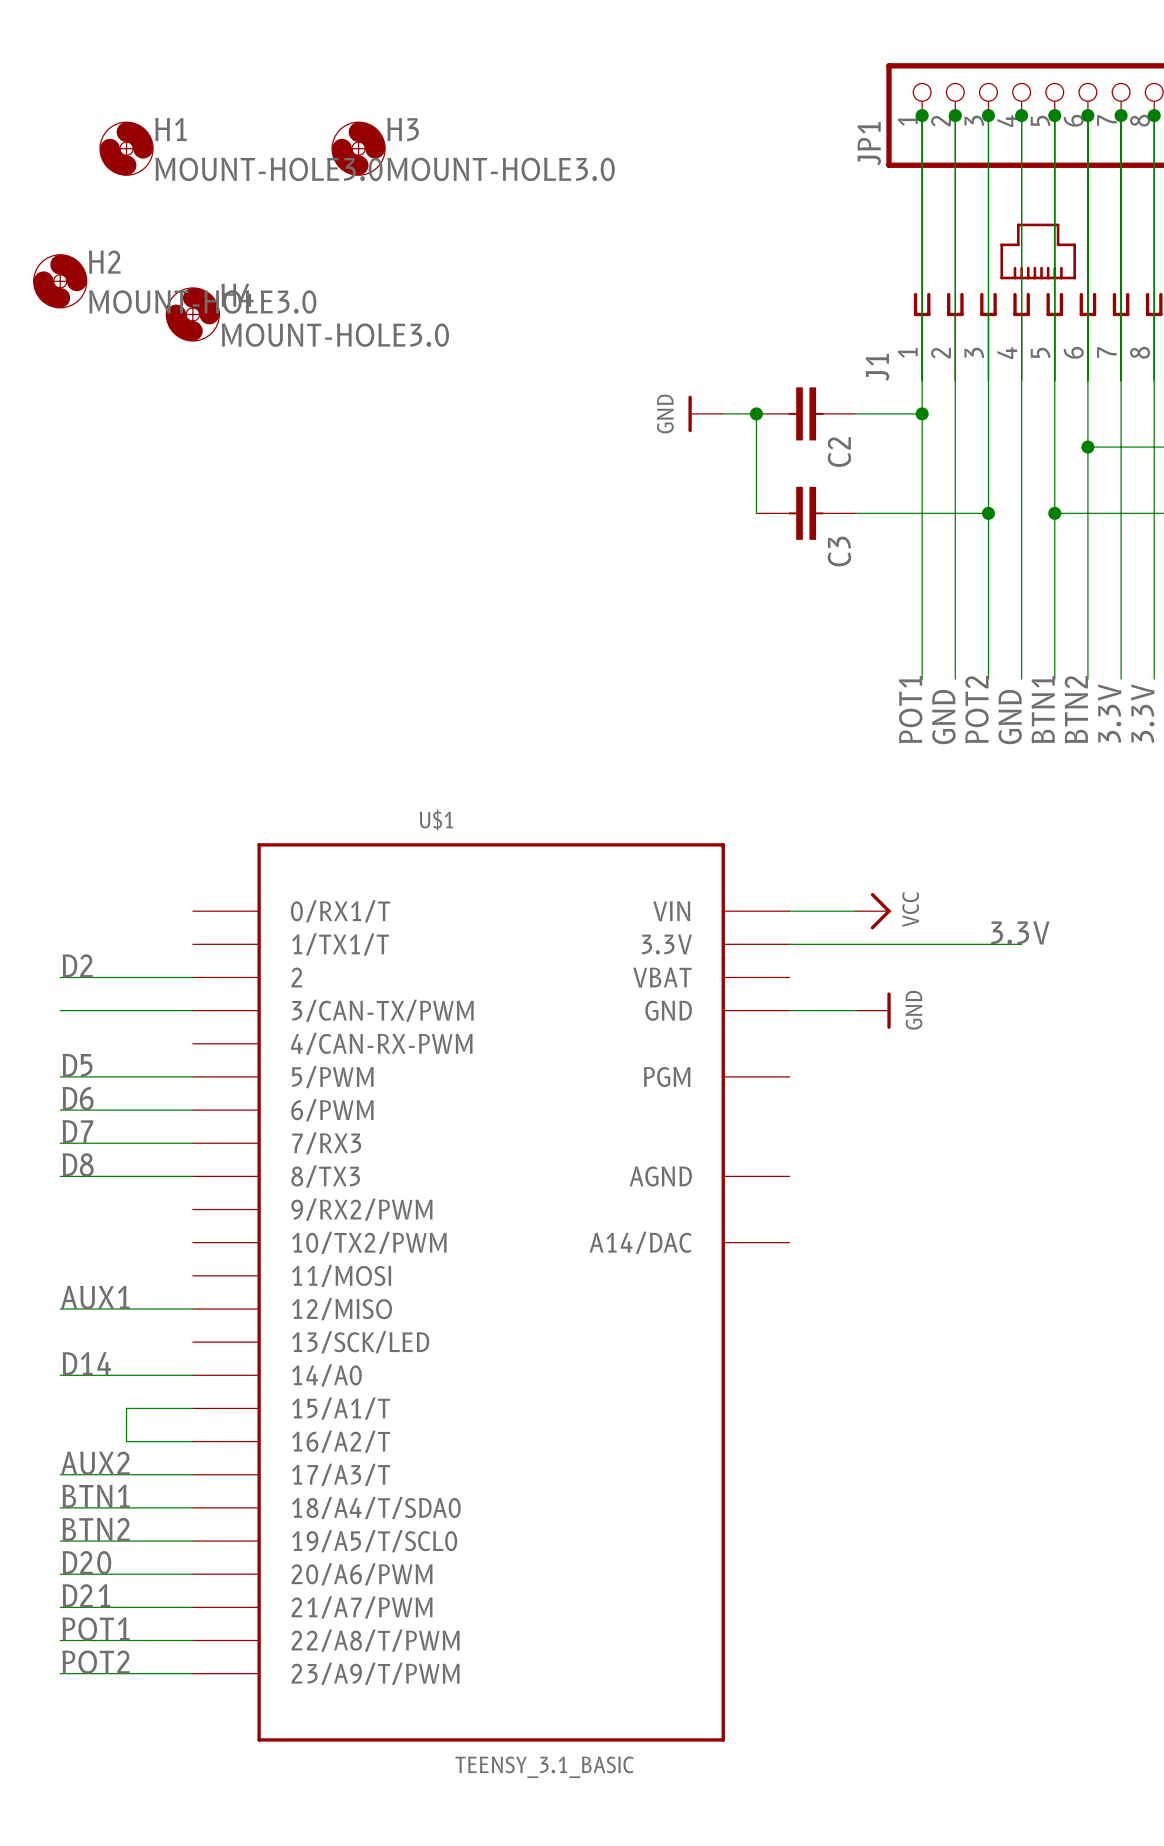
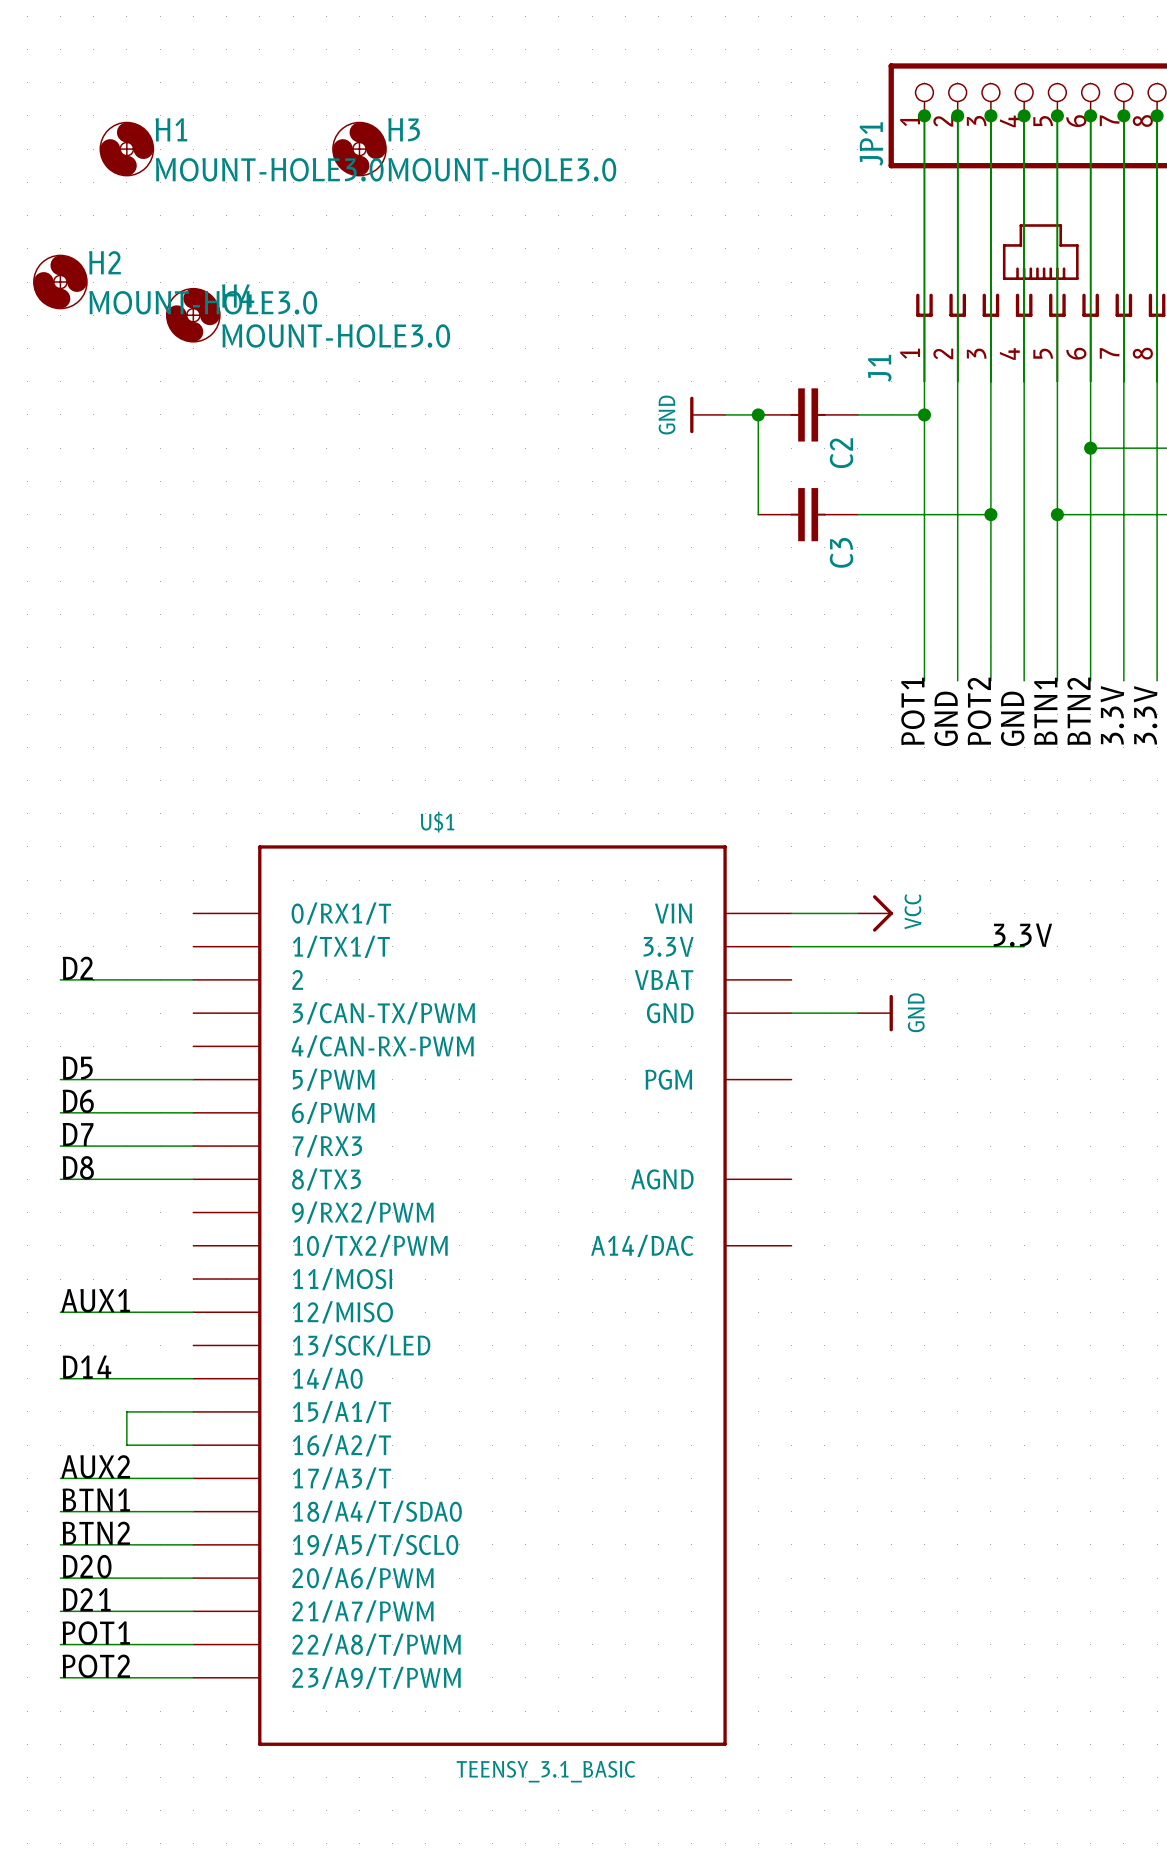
wire: (60, 1010) (192, 1010) -> none

